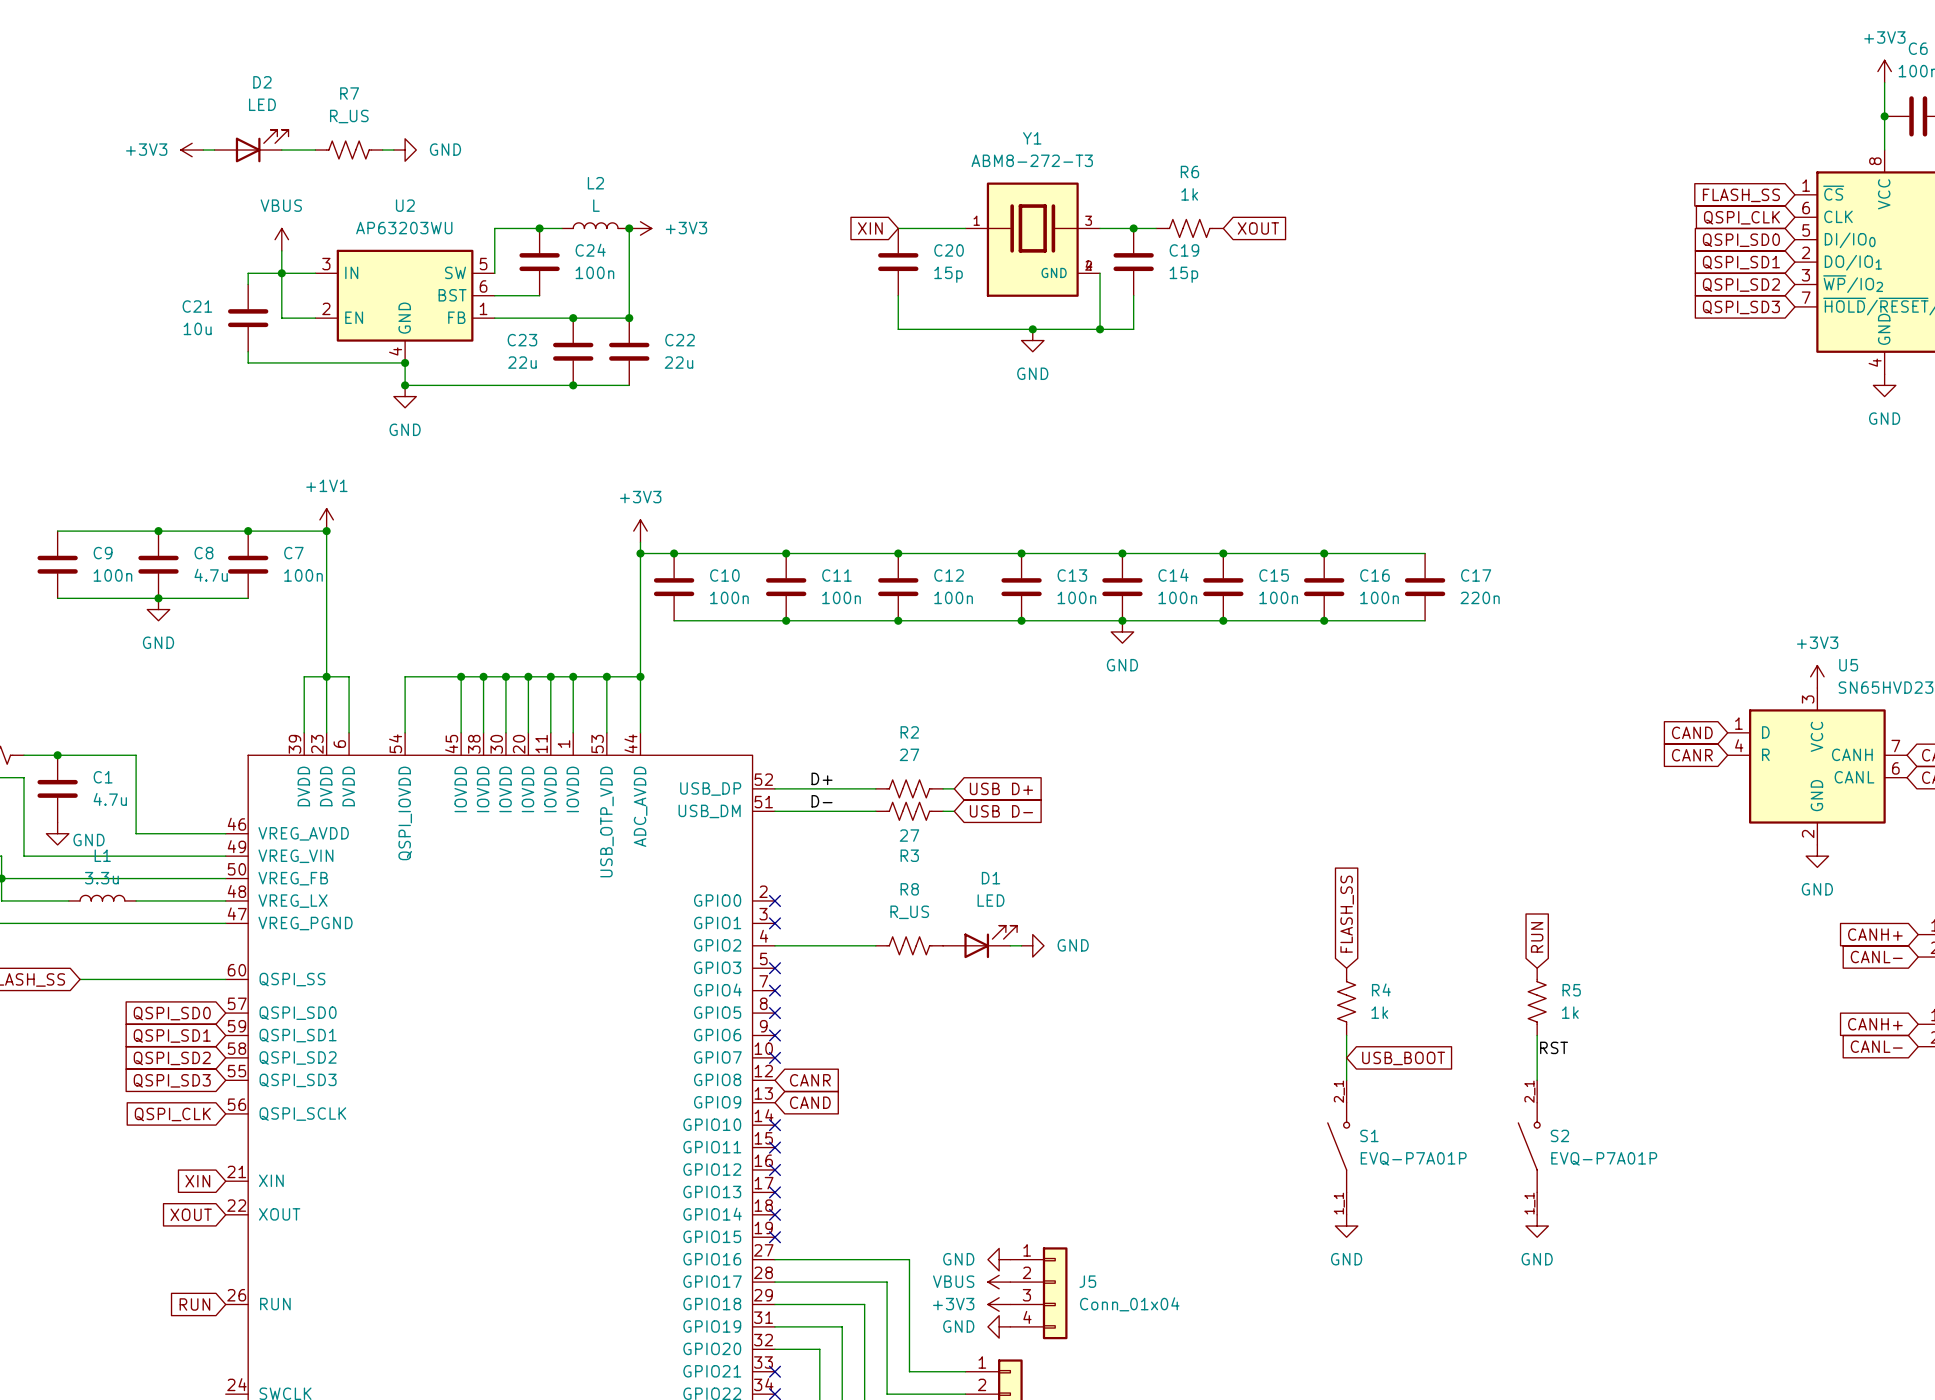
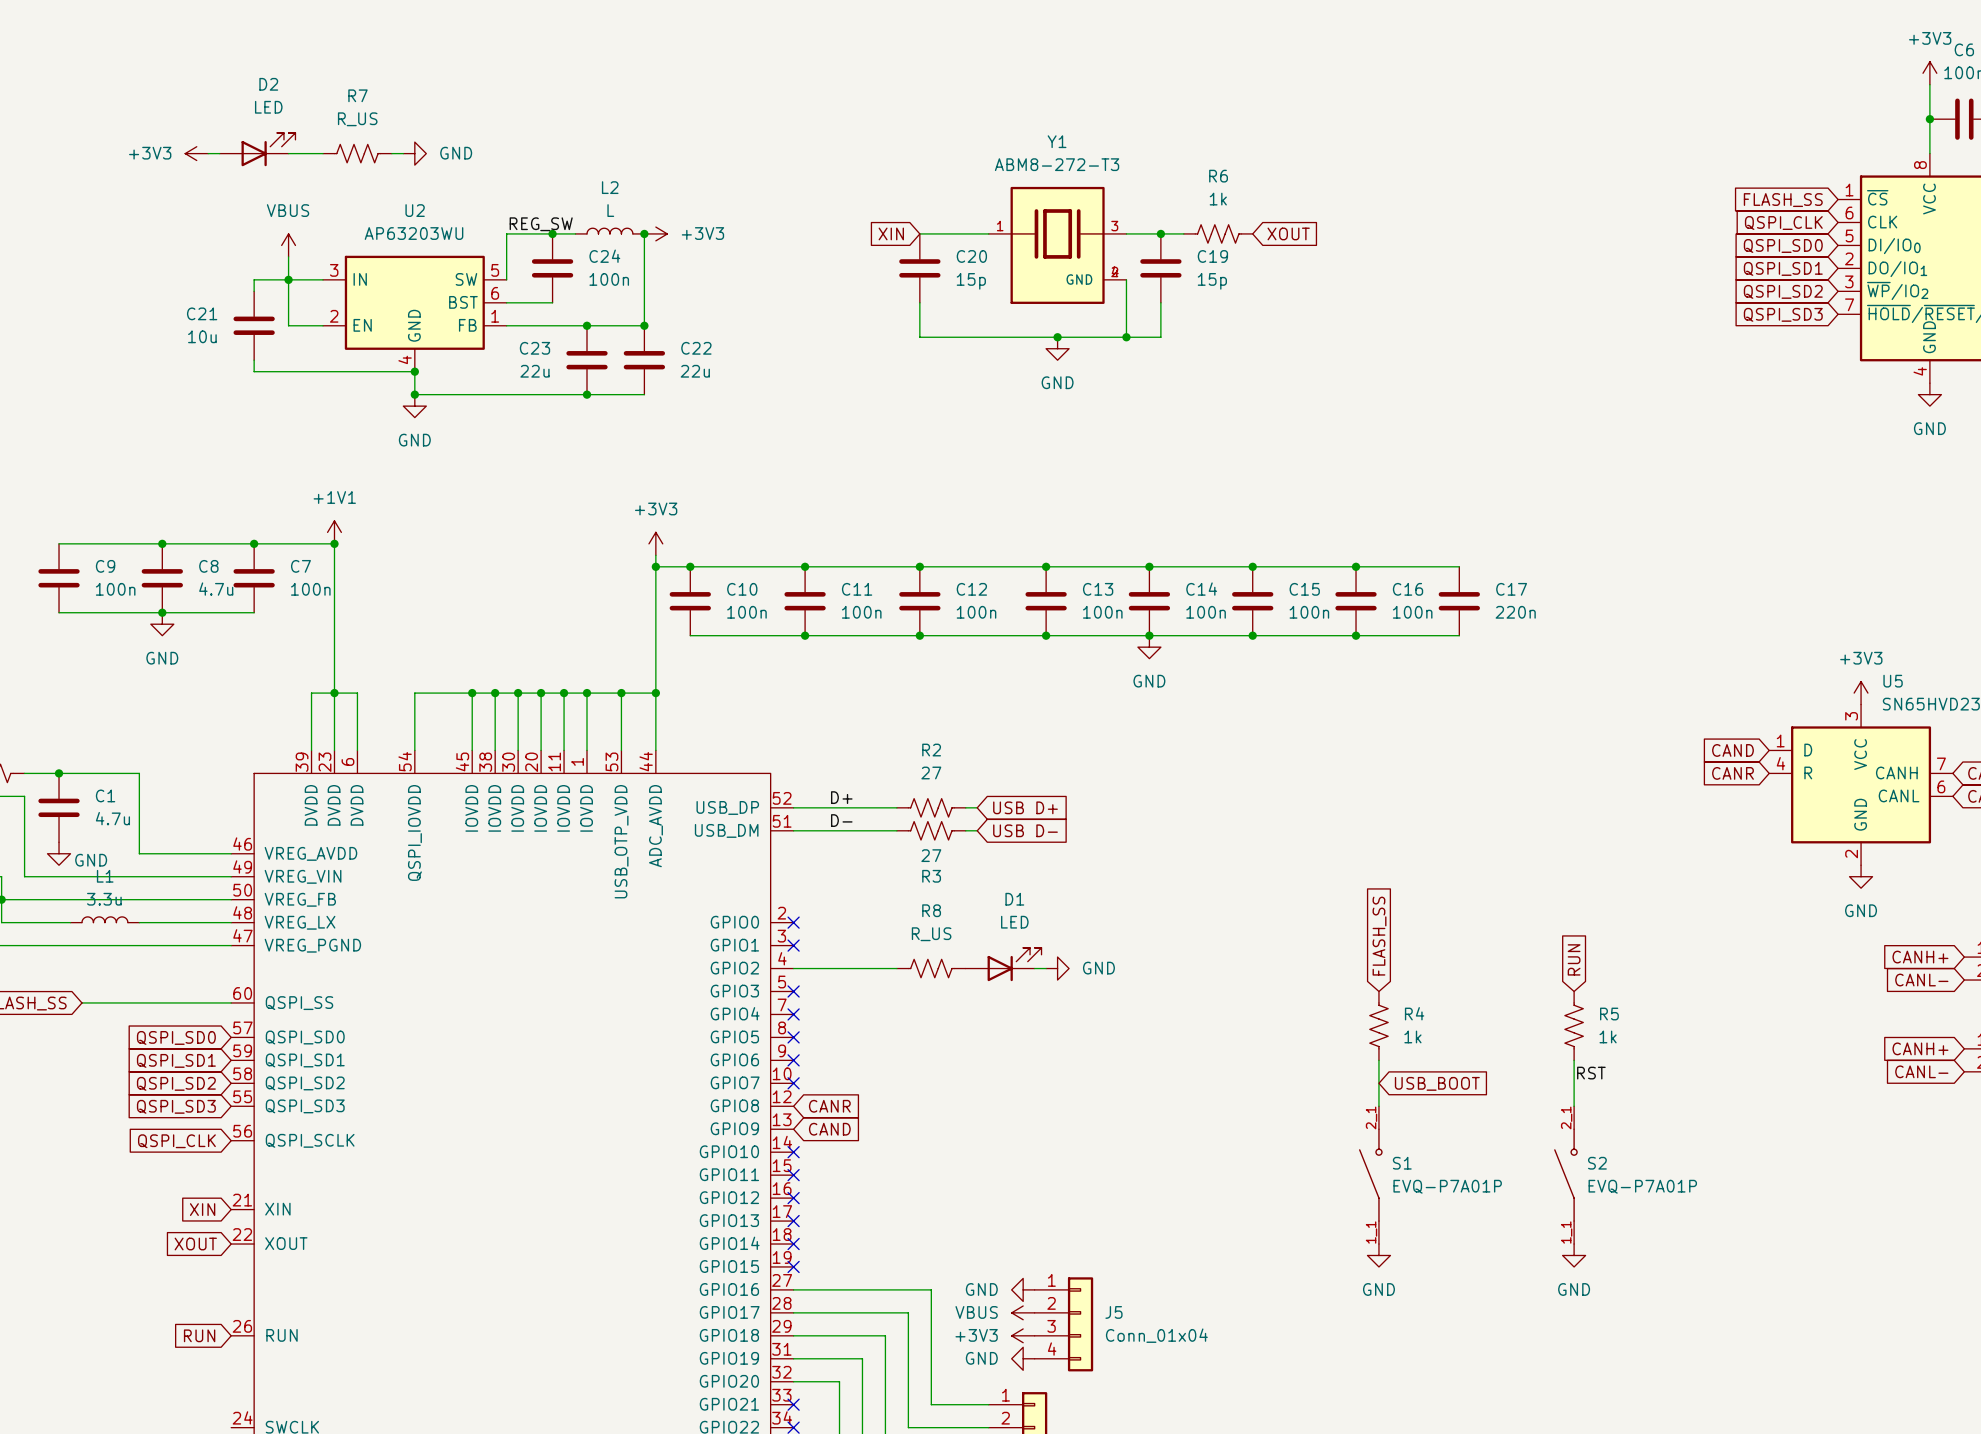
label: none -> REG_SW (541, 224)

